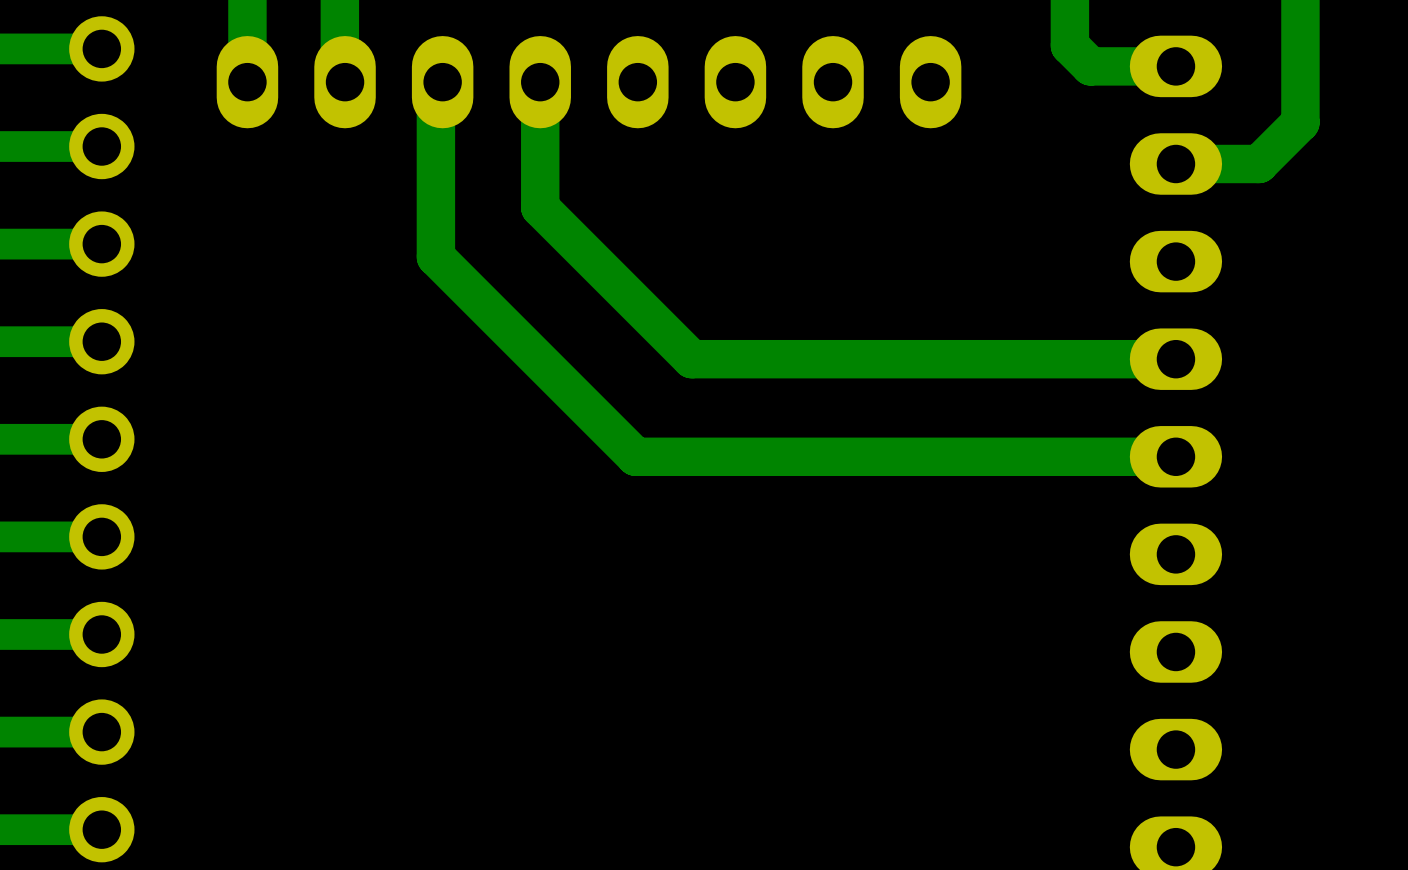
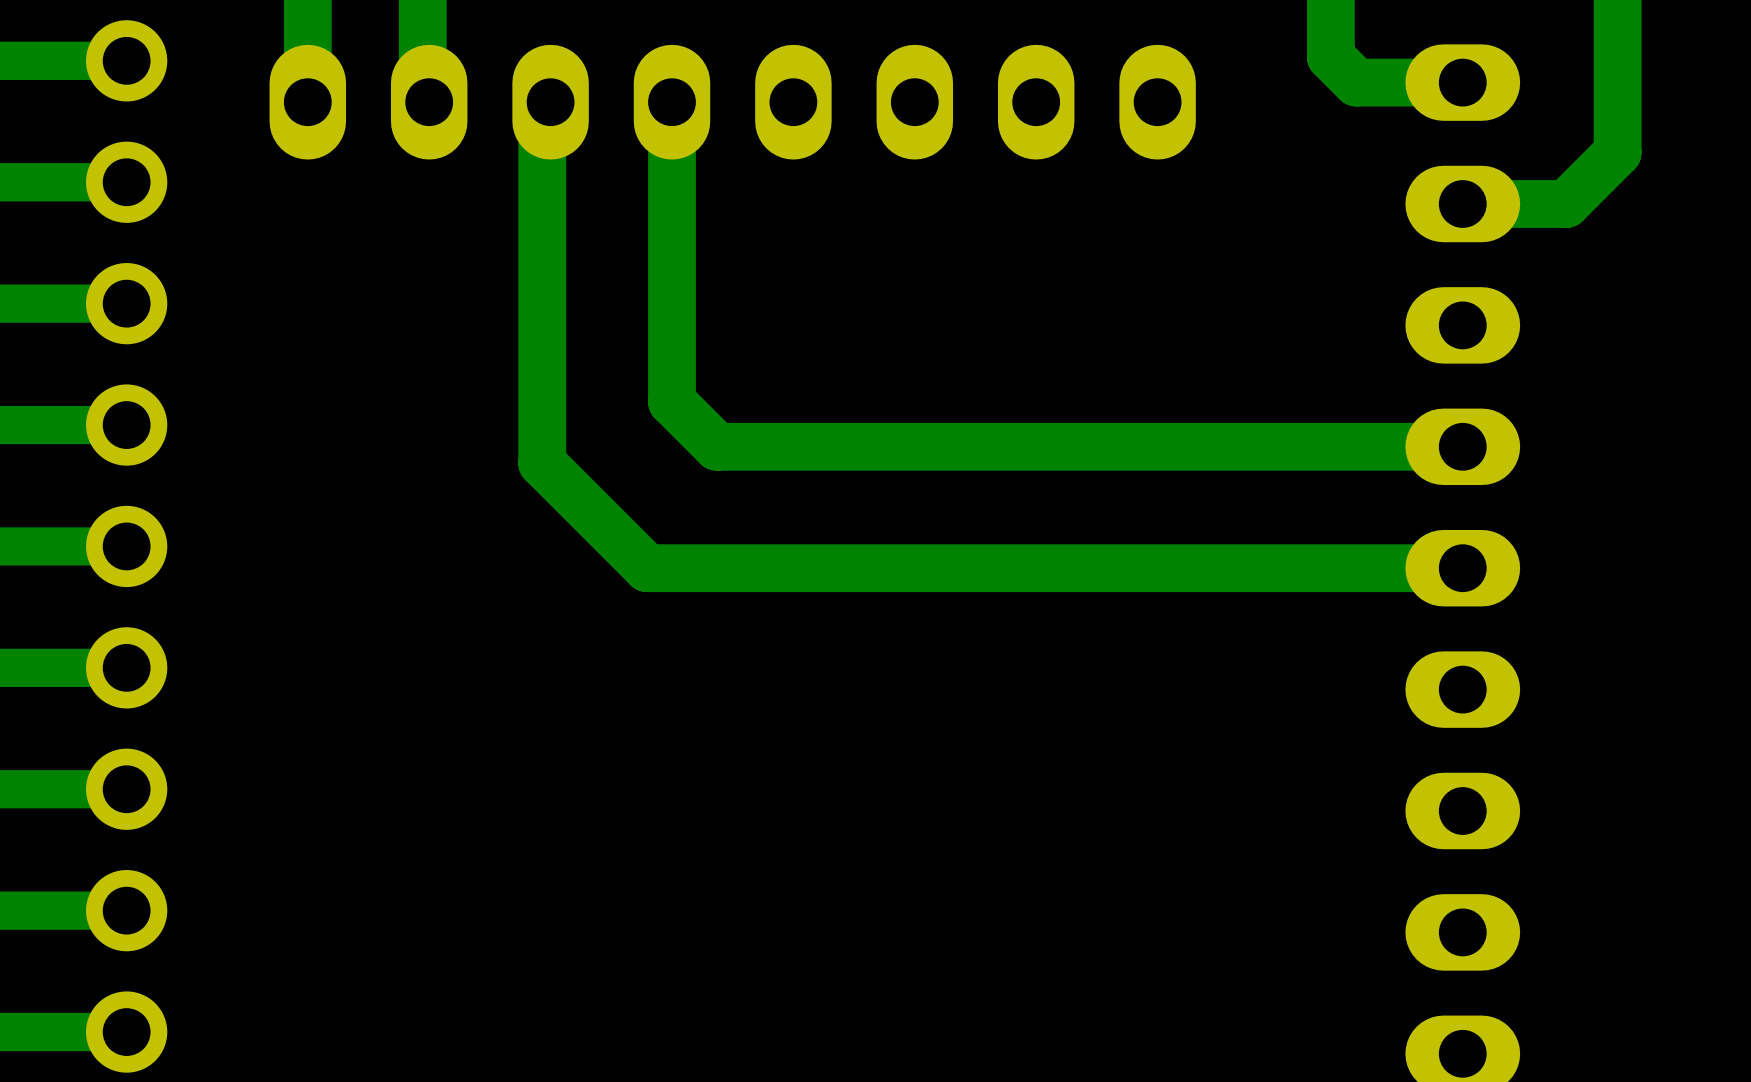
track: (540, 207) (691, 359) -> (672, 258) (672, 401) (717, 446) (860, 446)
track: (435, 256) (635, 456) -> (542, 319) (542, 463) (647, 568) (790, 568)

